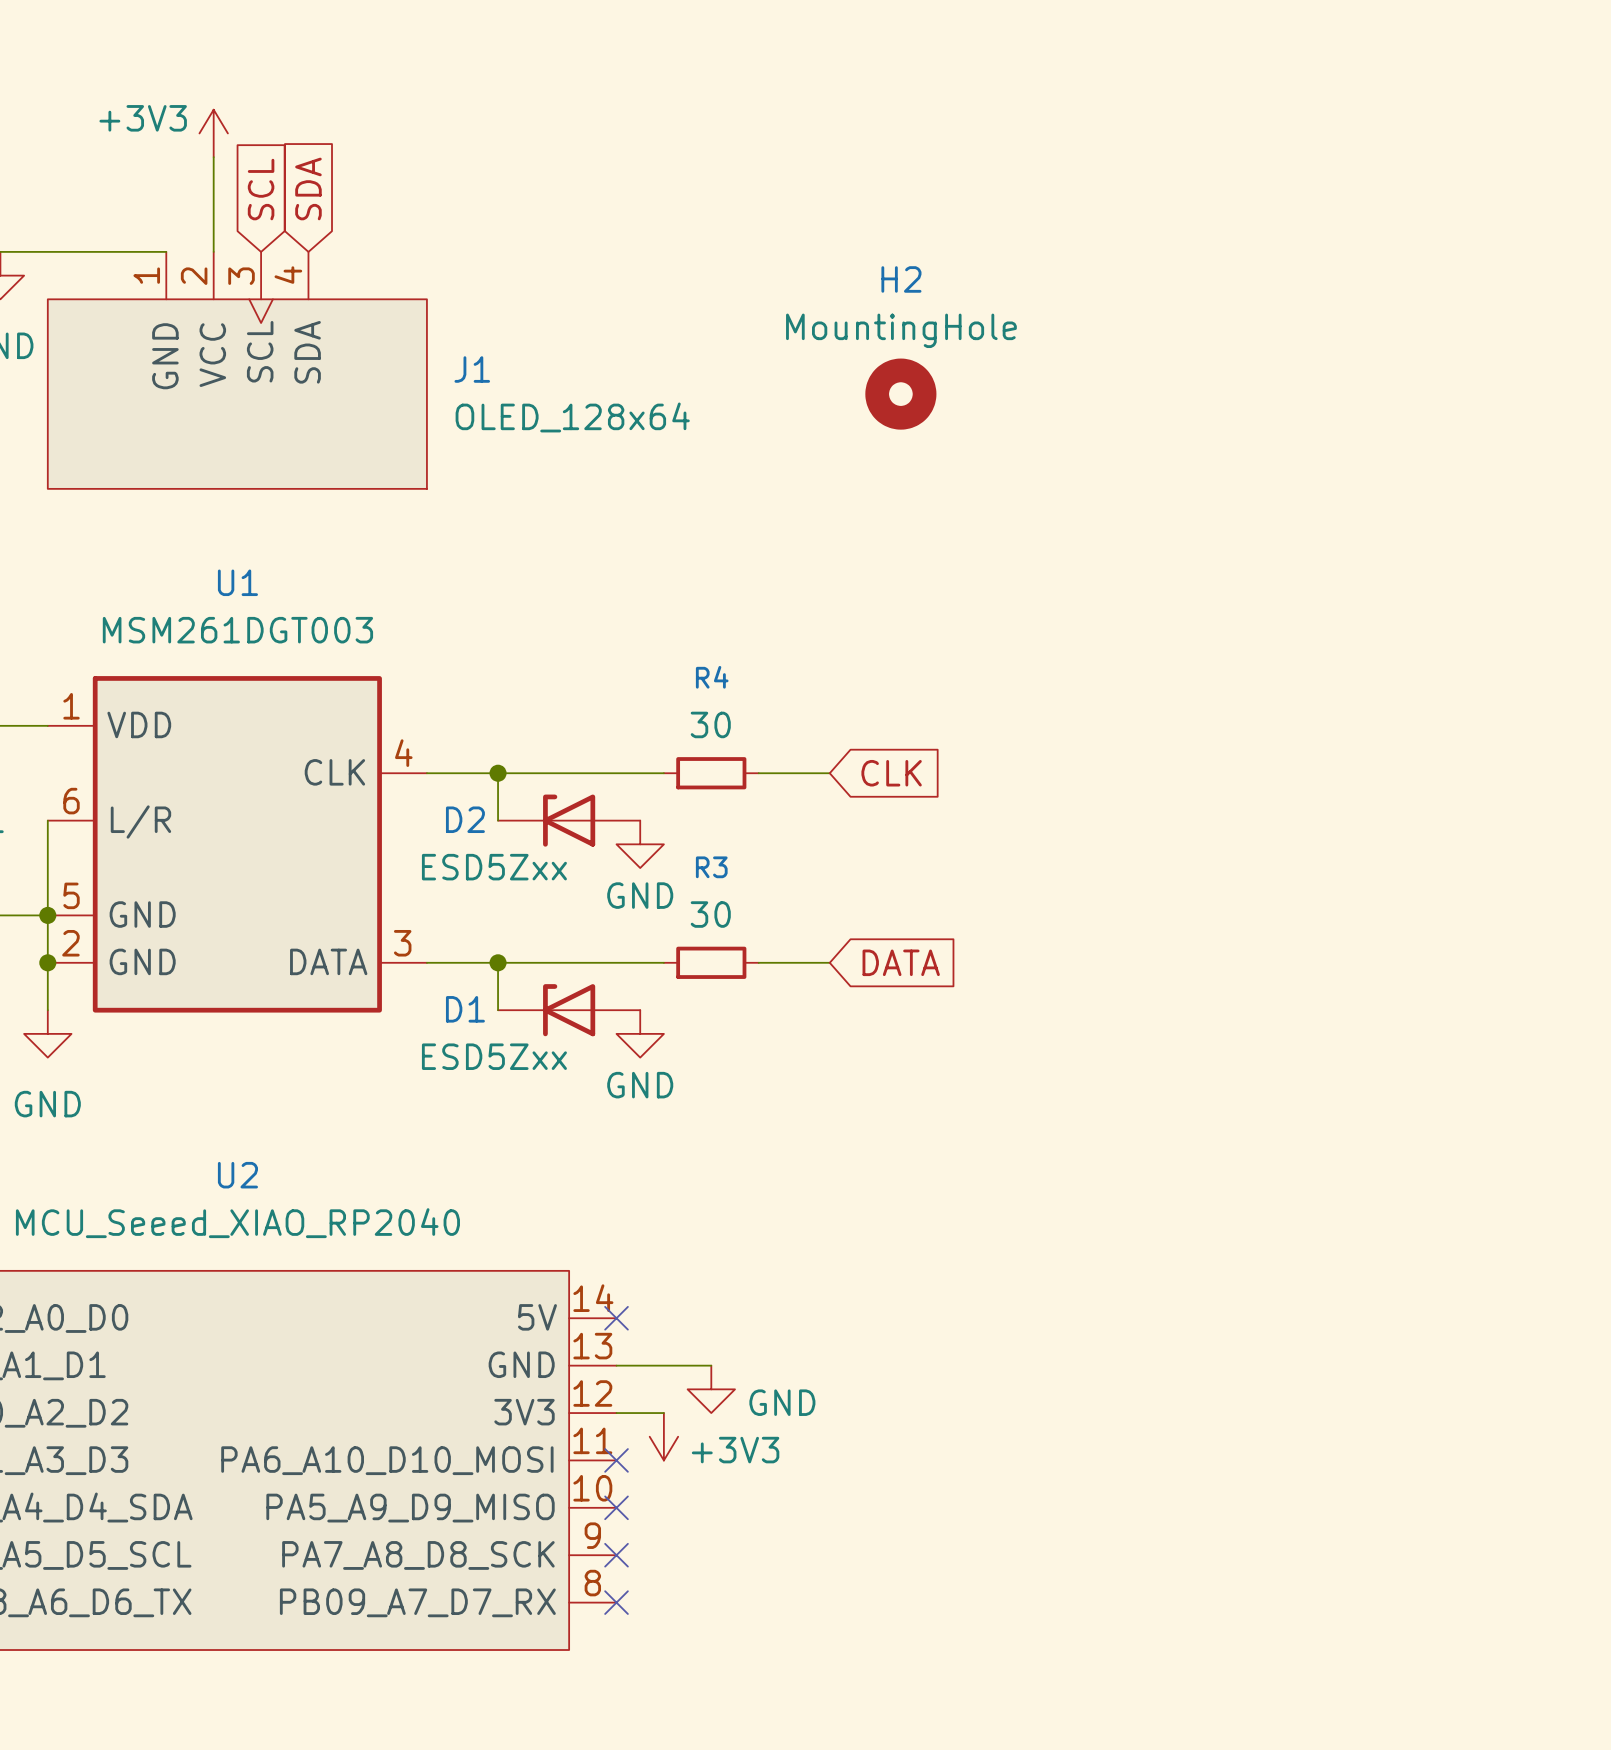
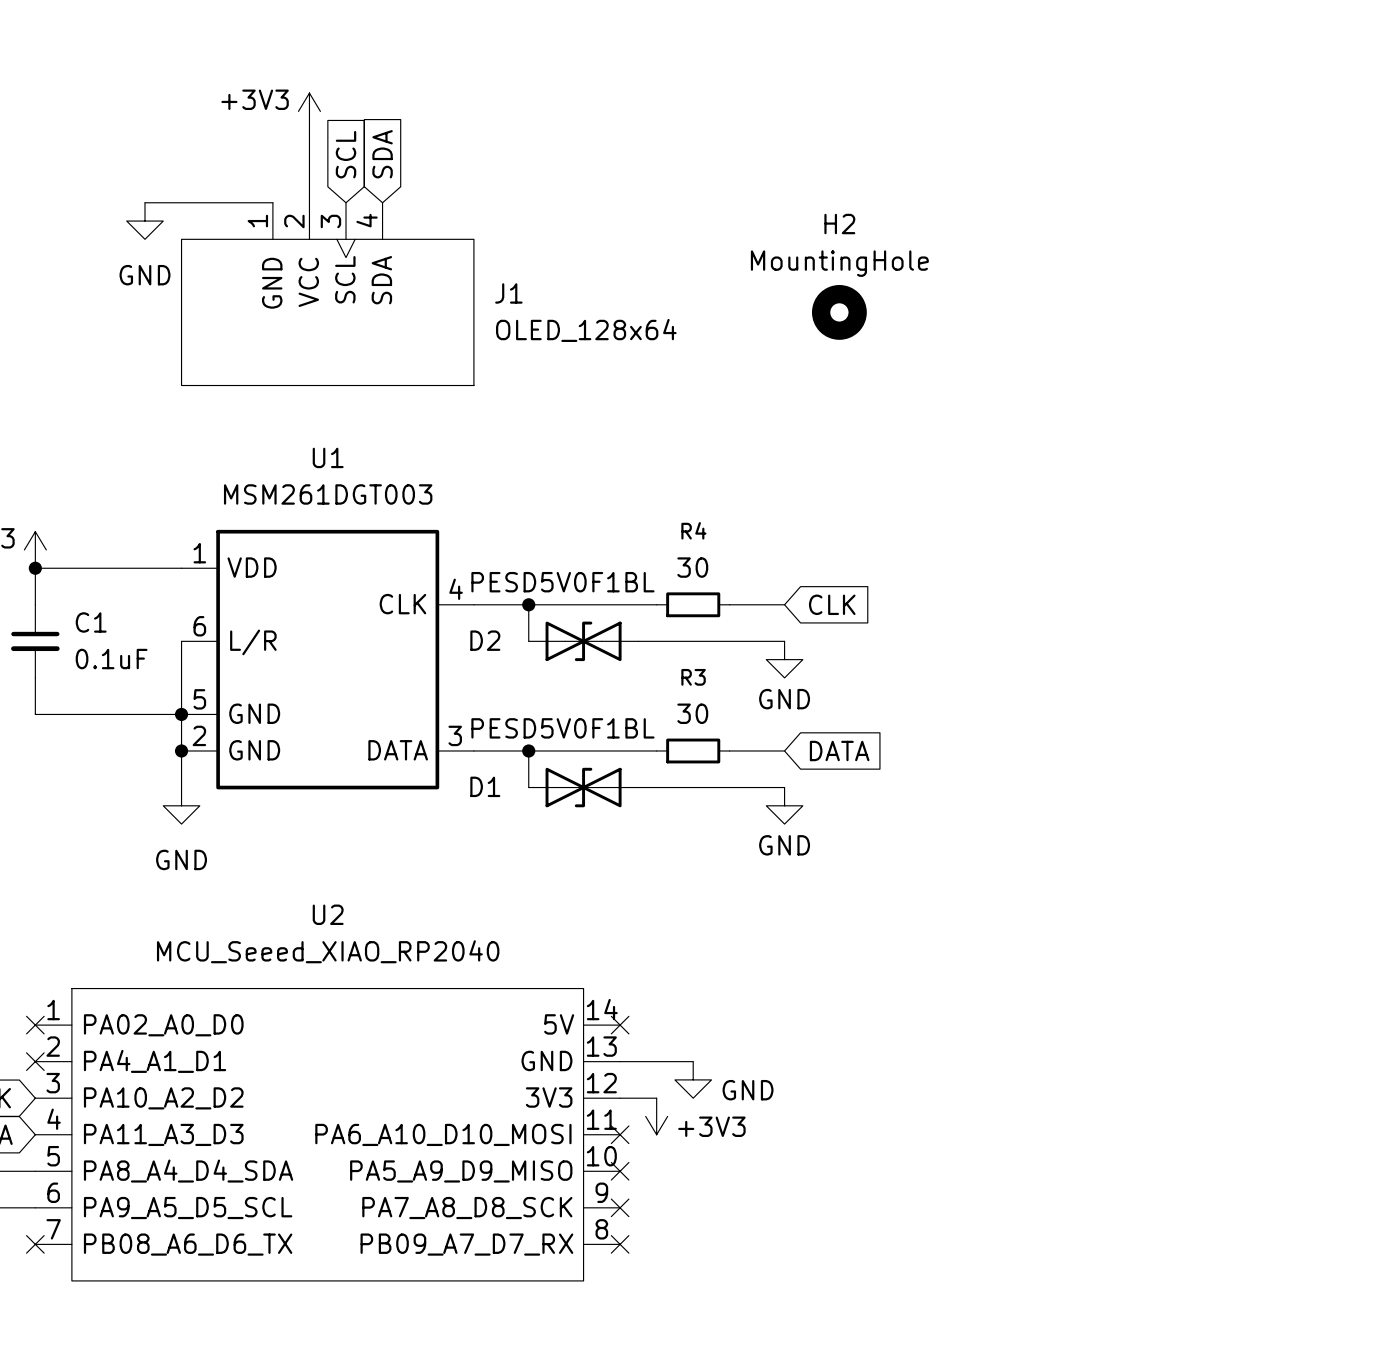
D2 symbol: [498, 794, 641, 847] -> [528, 621, 639, 662]
wire: none -> (638, 641) (784, 641)
power symbol: GND (640, 844) -> none
power symbol: none -> GND (784, 659)
D2 value: ESD5Zxx (494, 867) -> PESD5V0F1BL (562, 582)
D1 symbol: [498, 984, 641, 1037] -> [528, 767, 639, 808]
wire: none -> (638, 787) (784, 787)
power symbol: GND (640, 1033) -> none
power symbol: none -> GND (784, 805)
D1 value: ESD5Zxx (494, 1056) -> PESD5V0F1BL (562, 728)

